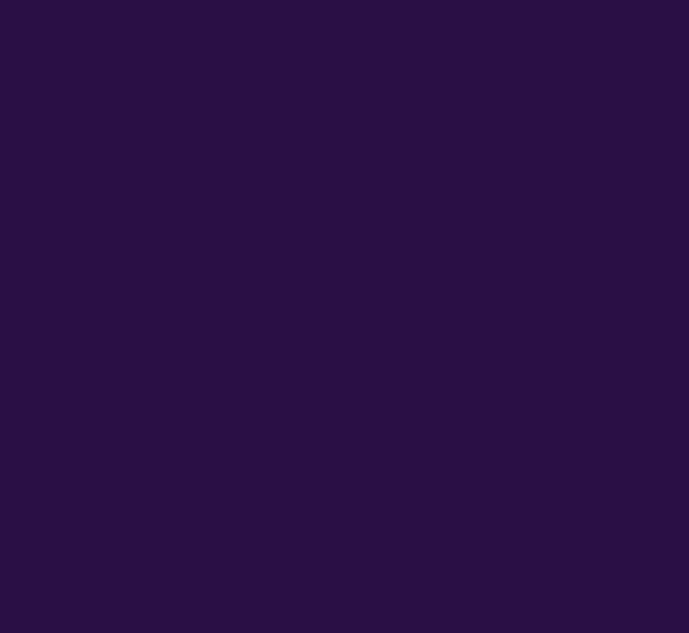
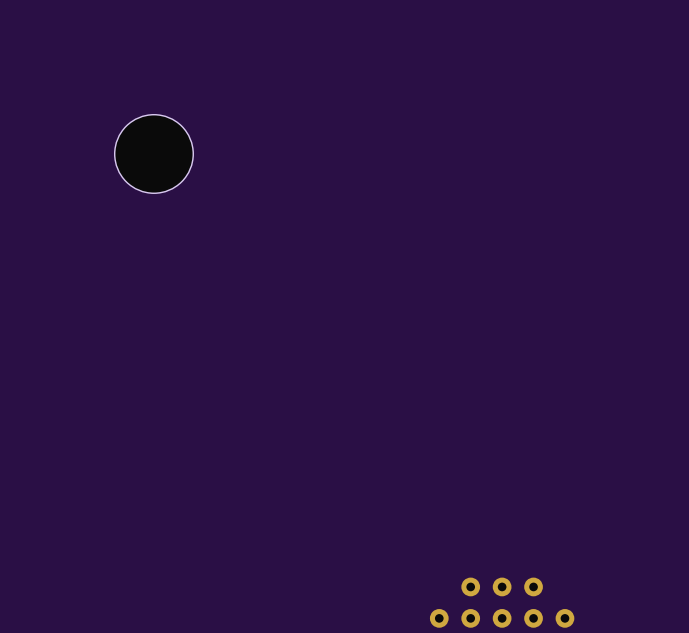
hole: none -> (153, 153)
via: none -> (470, 586)
via: none -> (502, 586)
via: none -> (533, 586)
via: none -> (439, 618)
via: none -> (470, 618)
via: none -> (502, 618)
via: none -> (533, 618)
via: none -> (564, 618)

